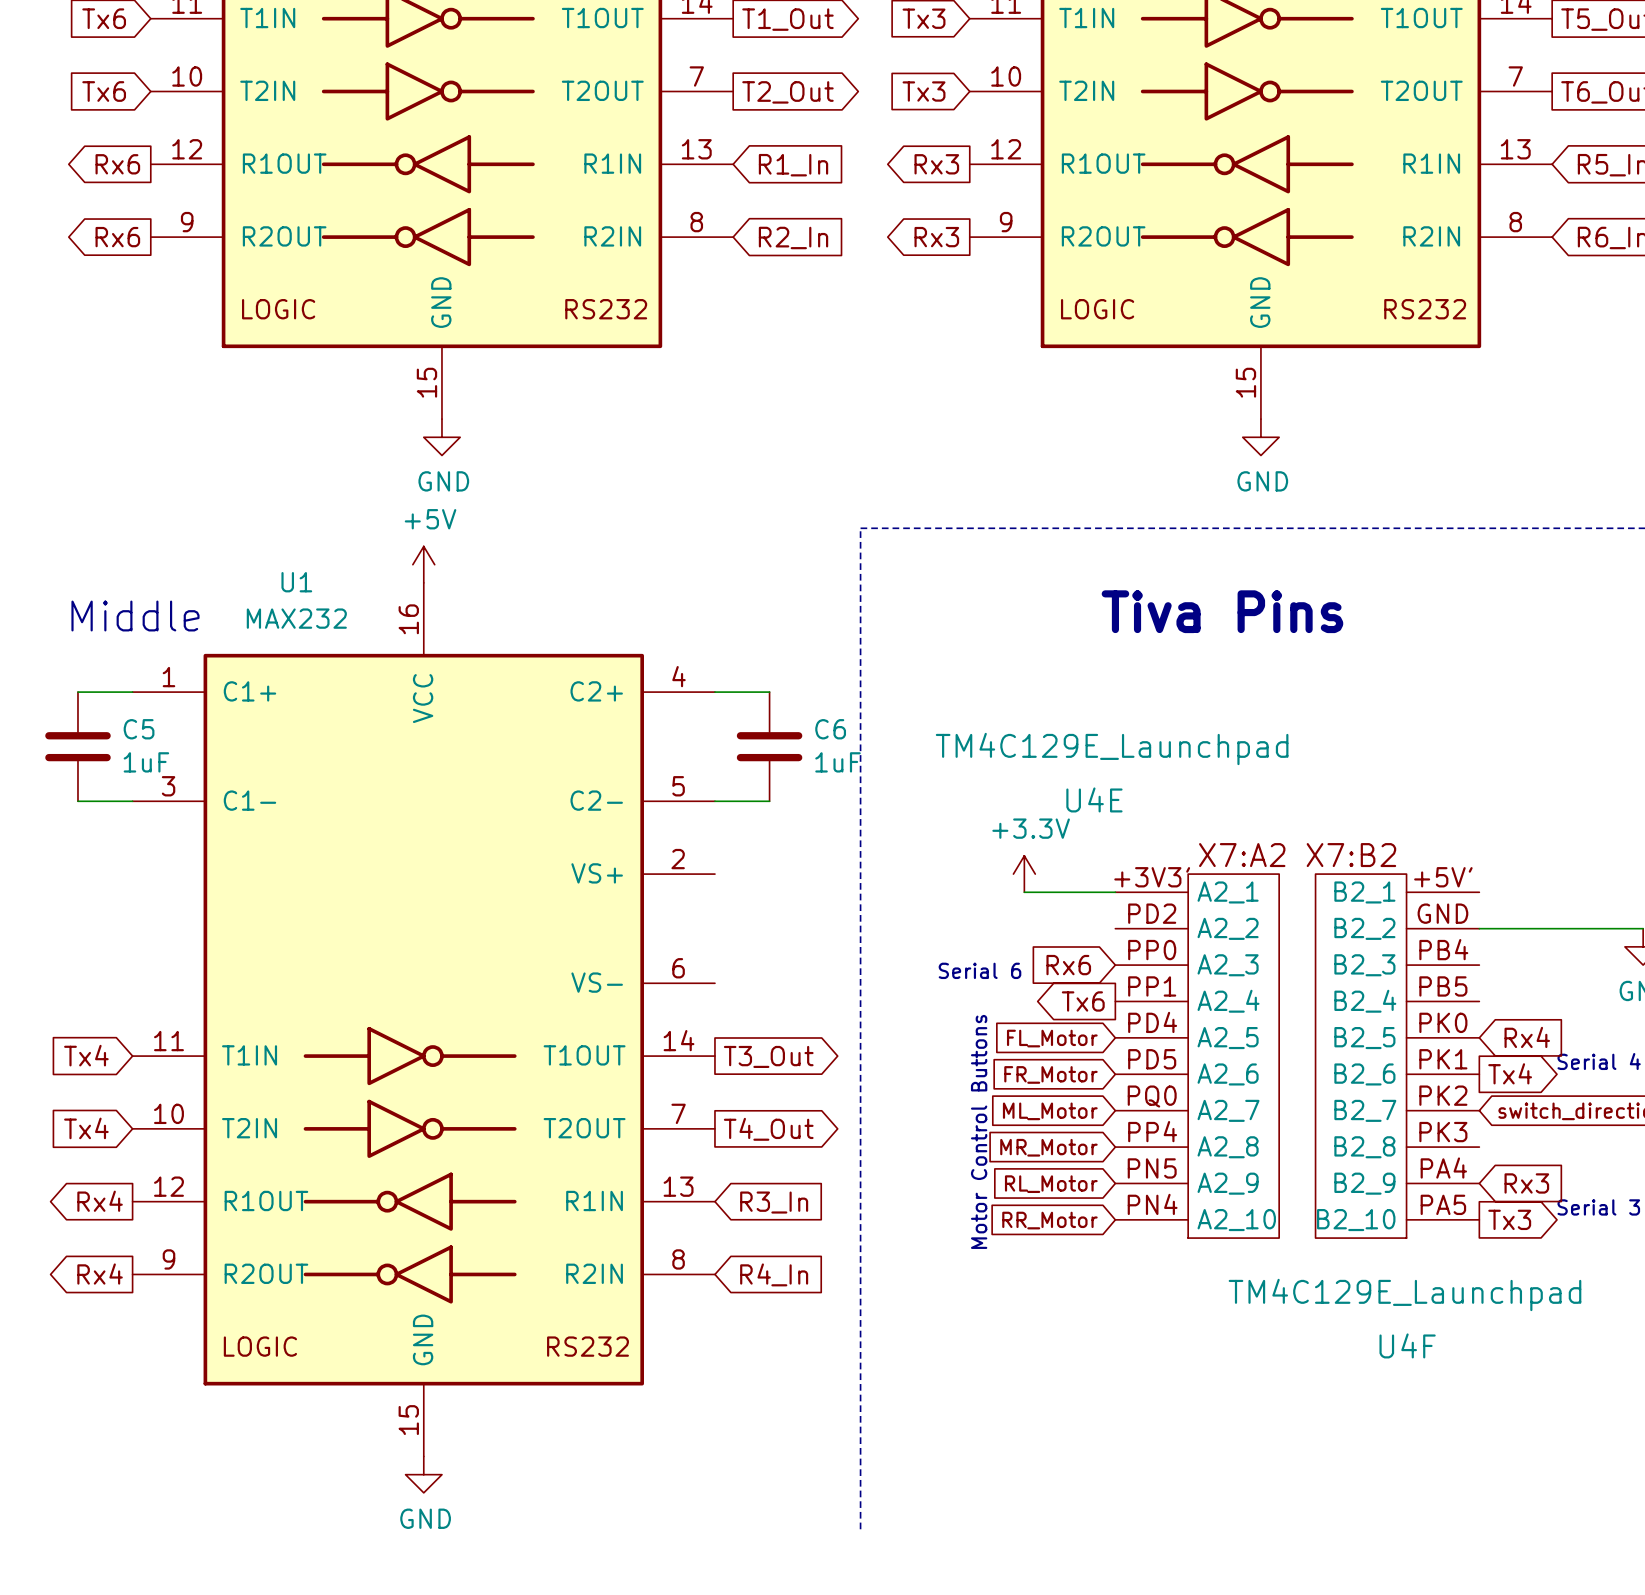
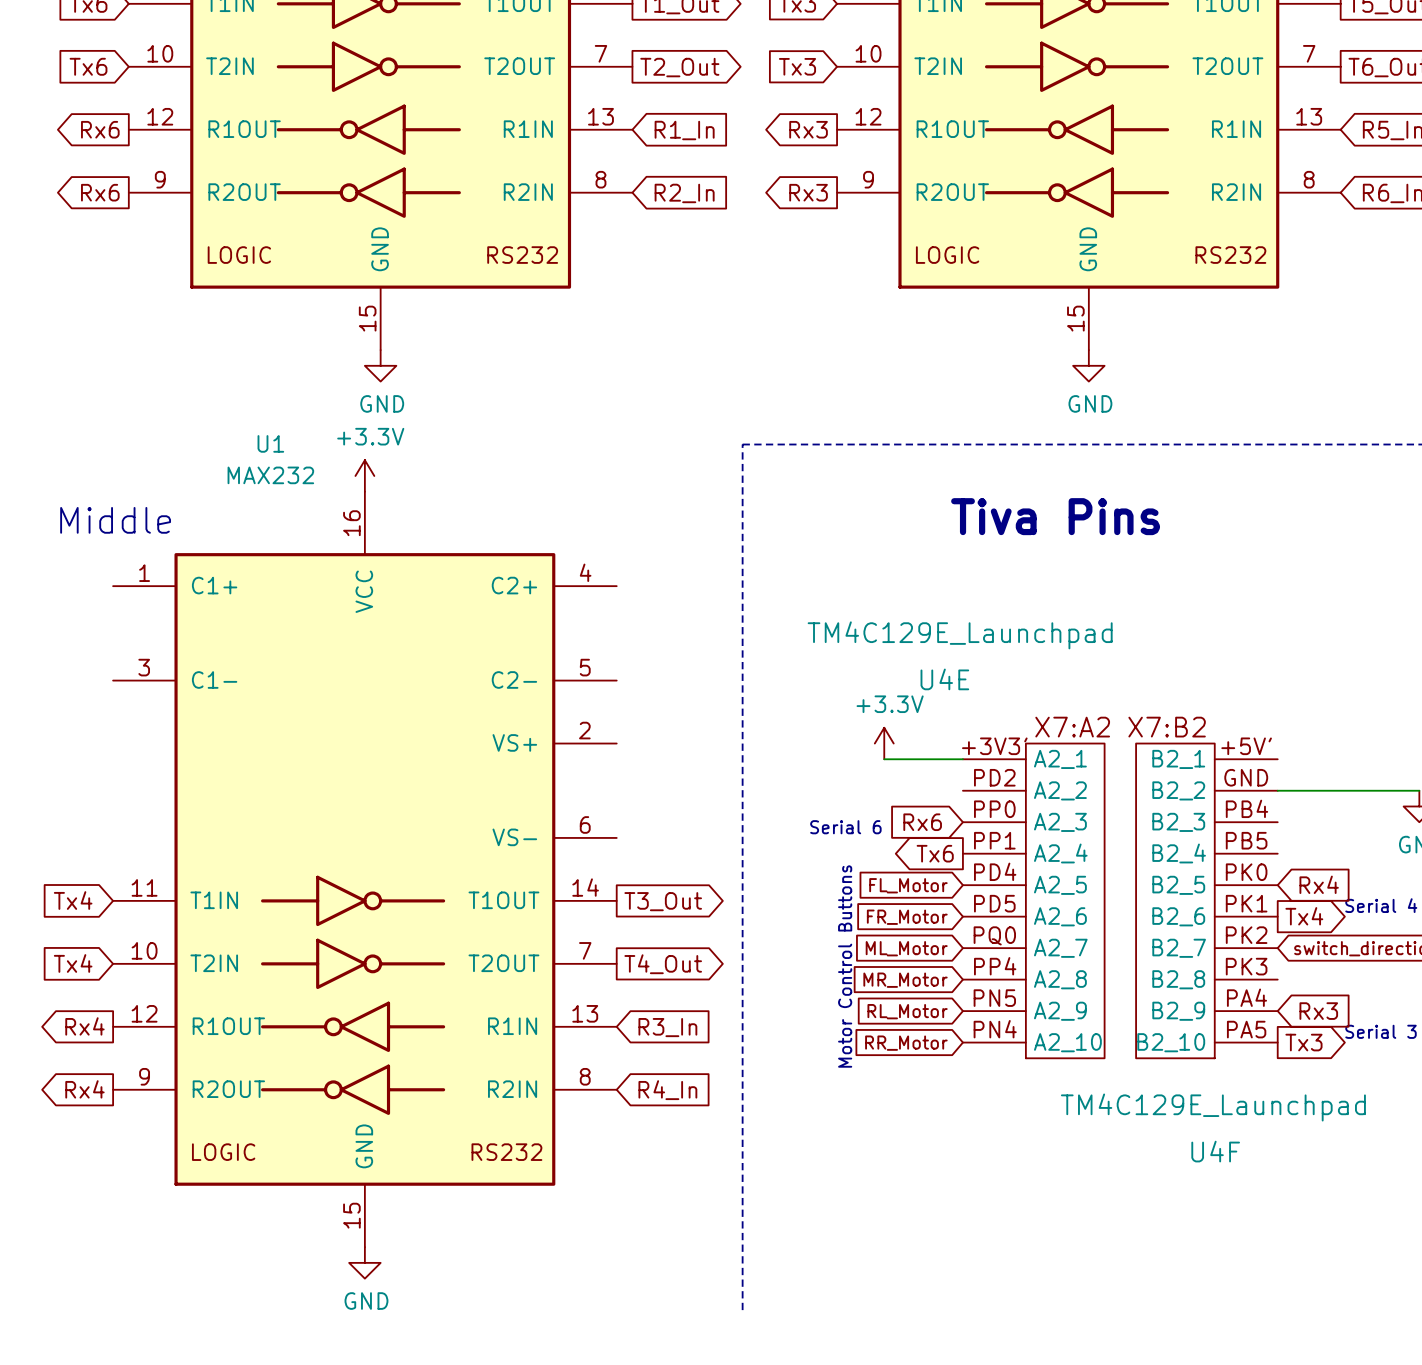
power symbol: +5V (423, 564) -> +3.3V (364, 475)
U1 name position: U1 (296, 582) -> U1 (270, 443)
U1 value position: MAX232 (296, 618) -> MAX232 (270, 475)
wire: (77, 692) (132, 692) -> none
wire: (714, 692) (769, 692) -> none
C5: 1uF (77, 746) -> none
C6: 1uF (769, 746) -> none
wire: (77, 801) (132, 801) -> none
wire: (714, 801) (769, 801) -> none

